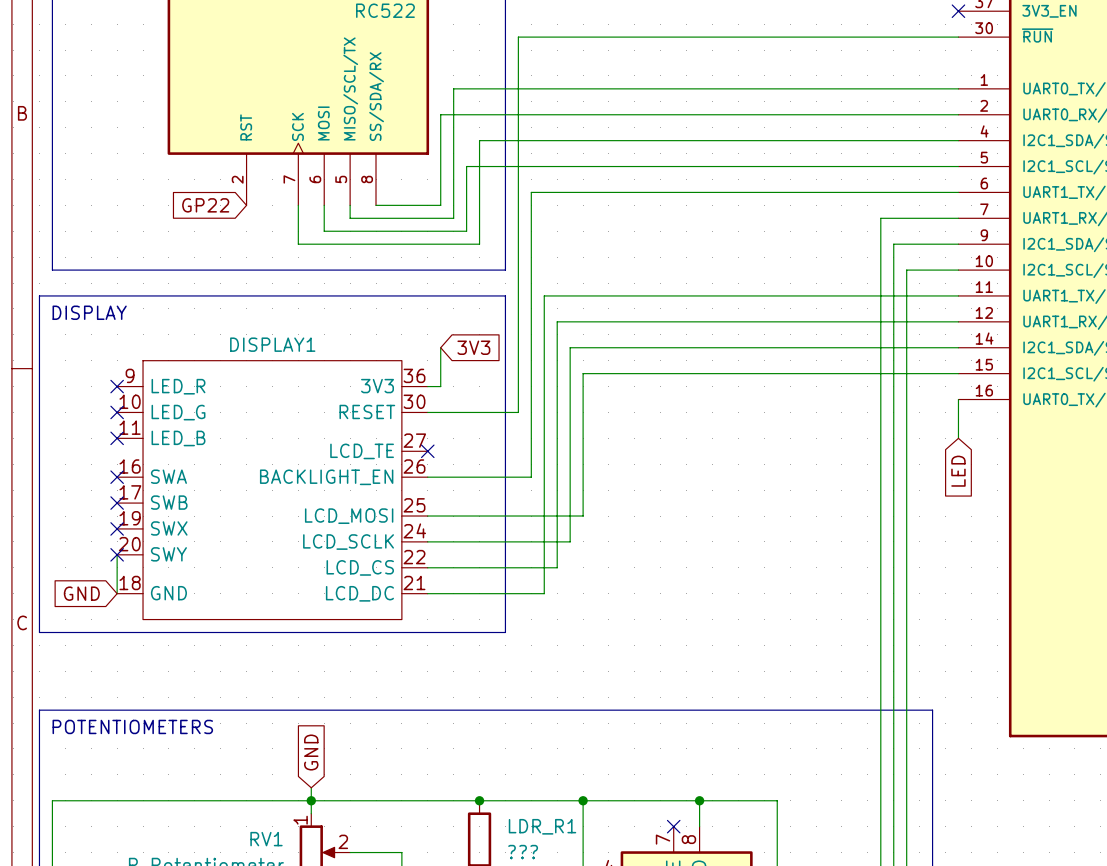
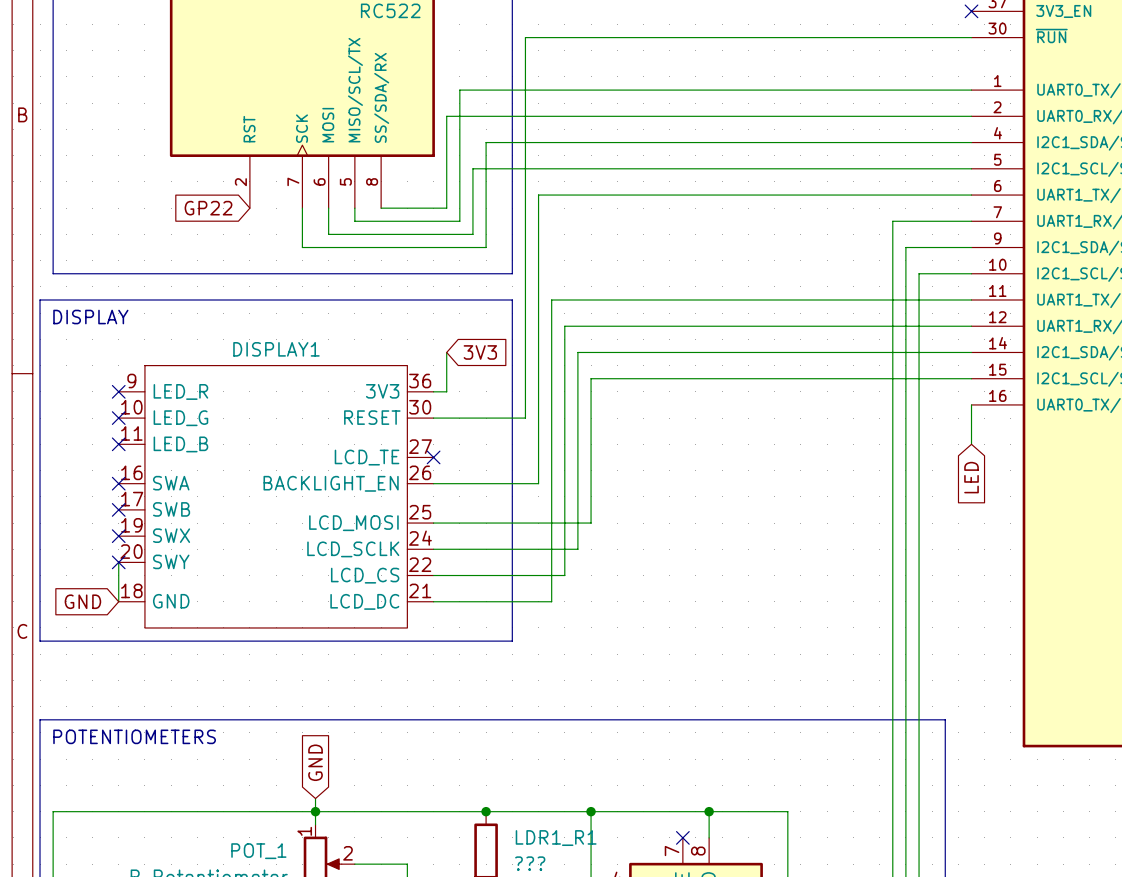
LDR_R1 name: LDR_R1 (542, 826) -> LDR1_R1 (556, 838)
RV1 name: RV1 (266, 839) -> POT_1 (258, 851)

